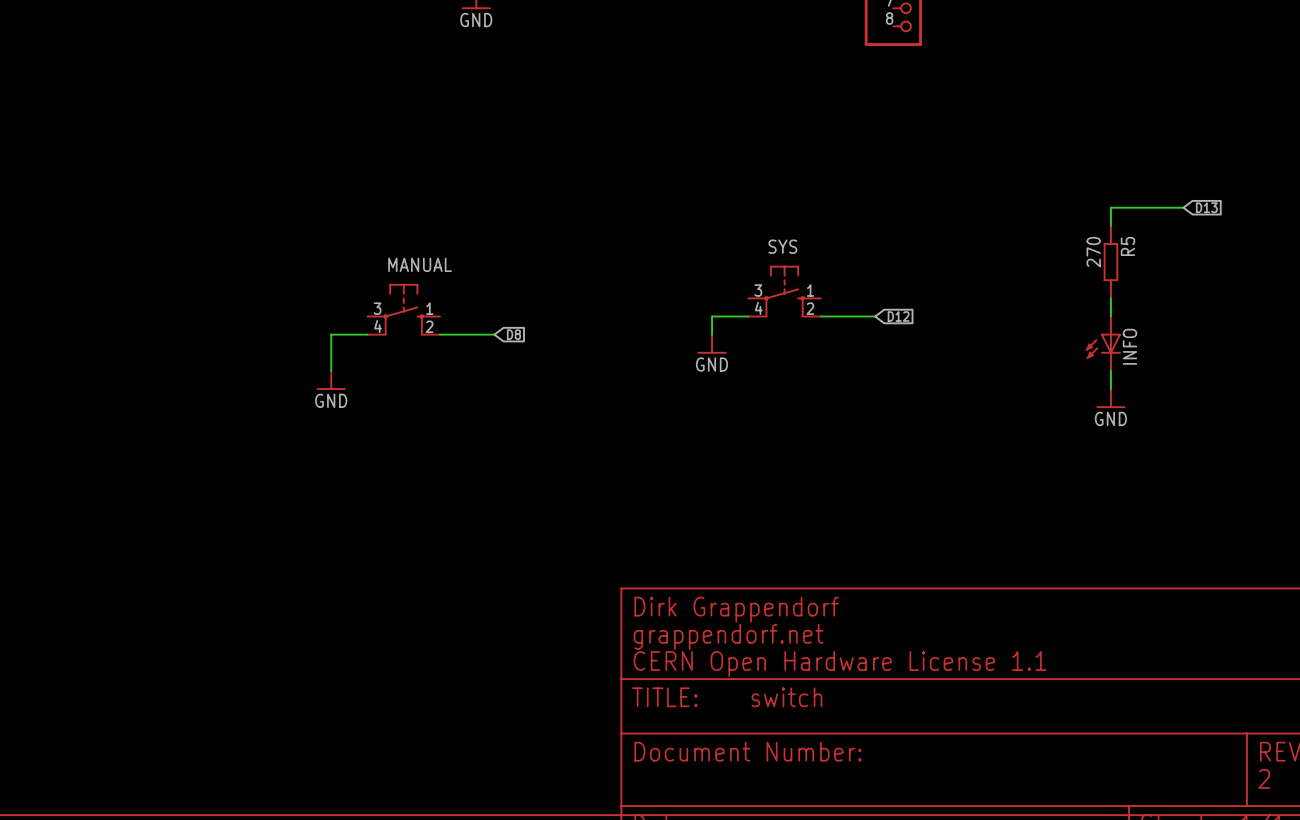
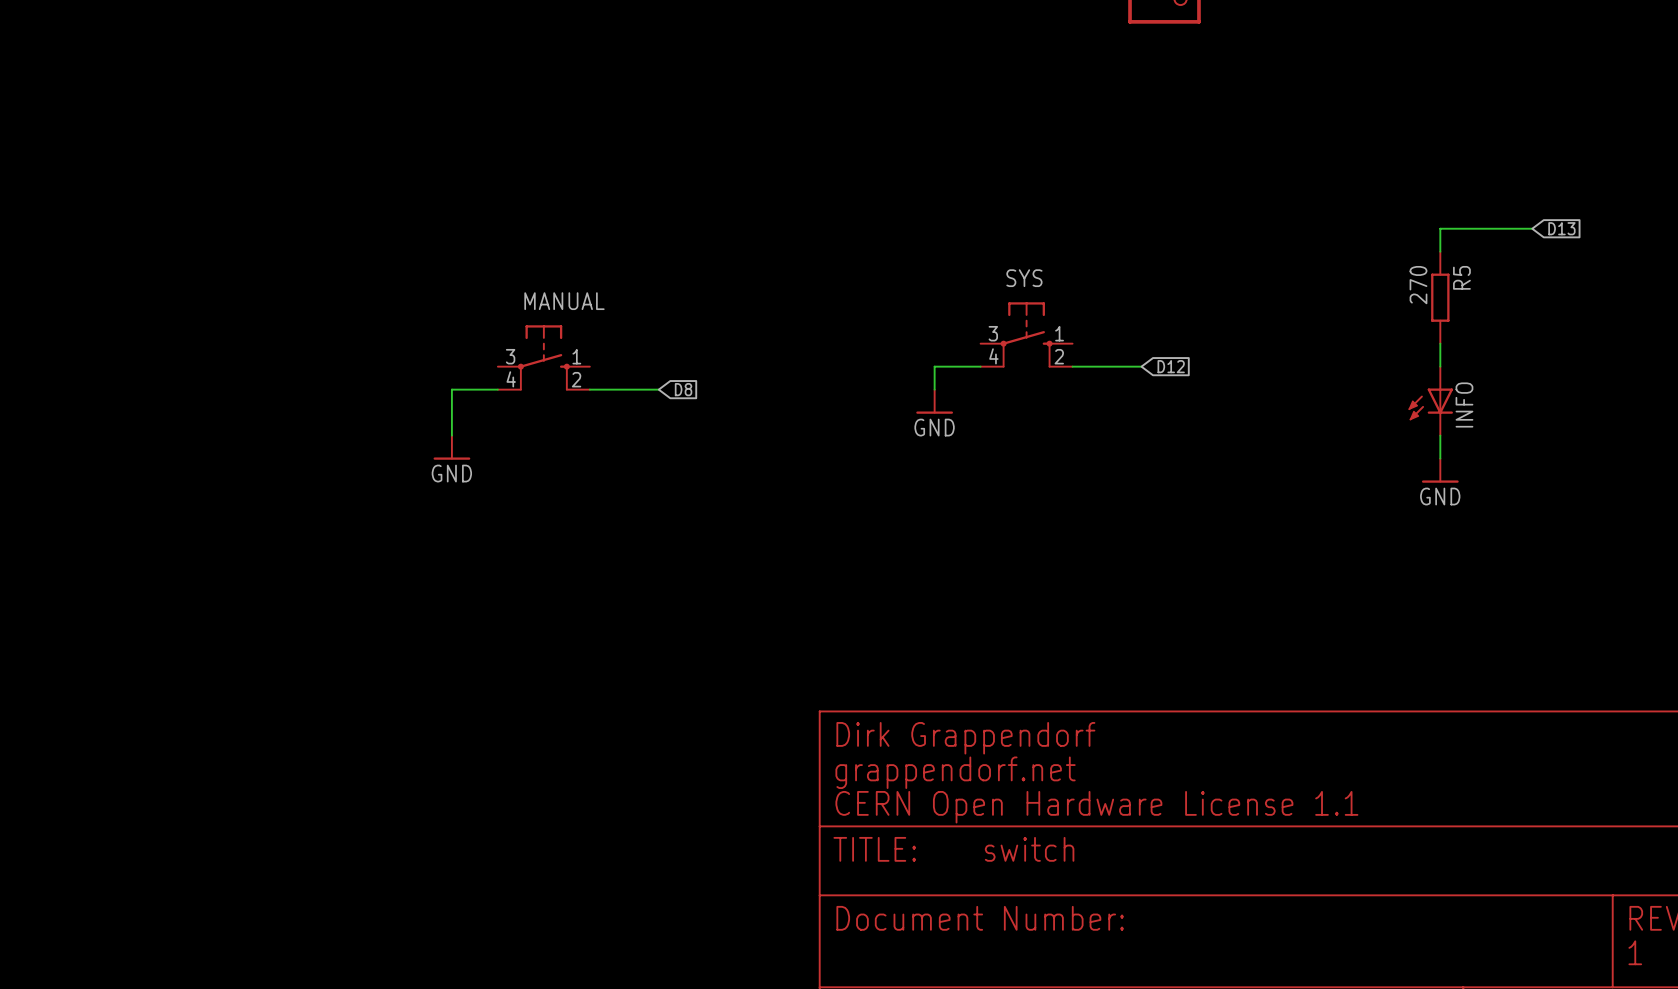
text: 2 (1264, 778) -> 1 (1635, 952)

